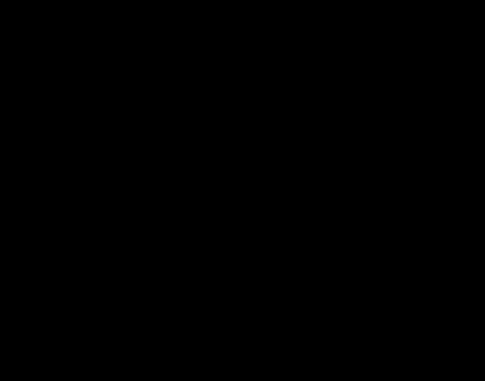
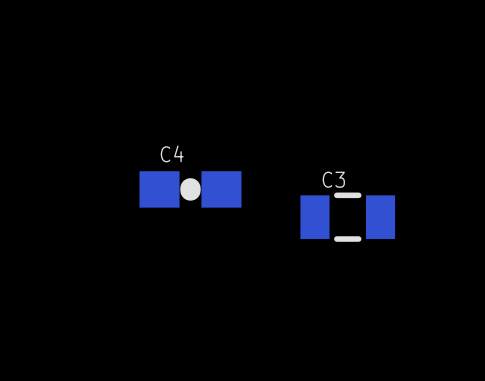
C4: none -> (190, 189)
C3: none -> (347, 217)

